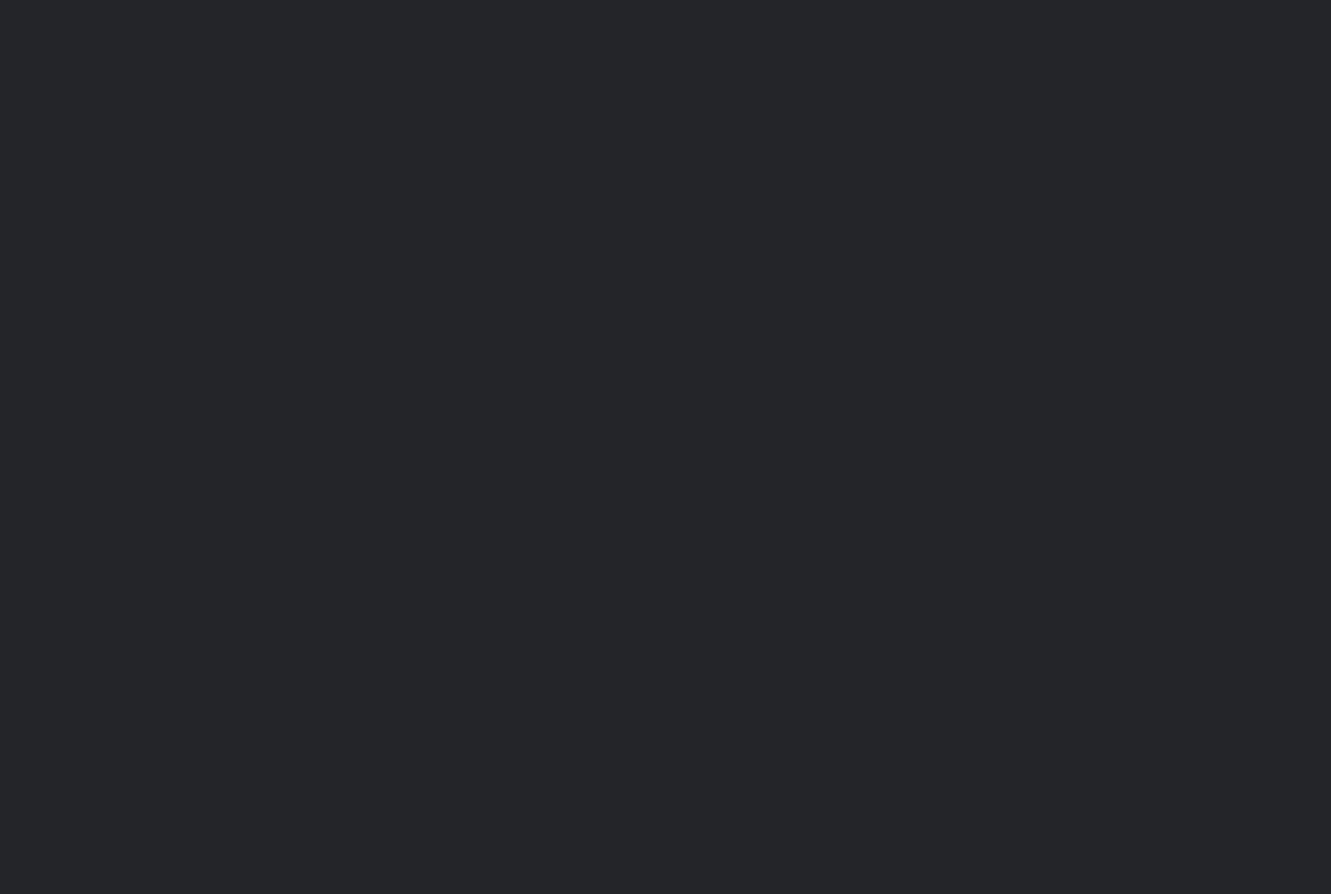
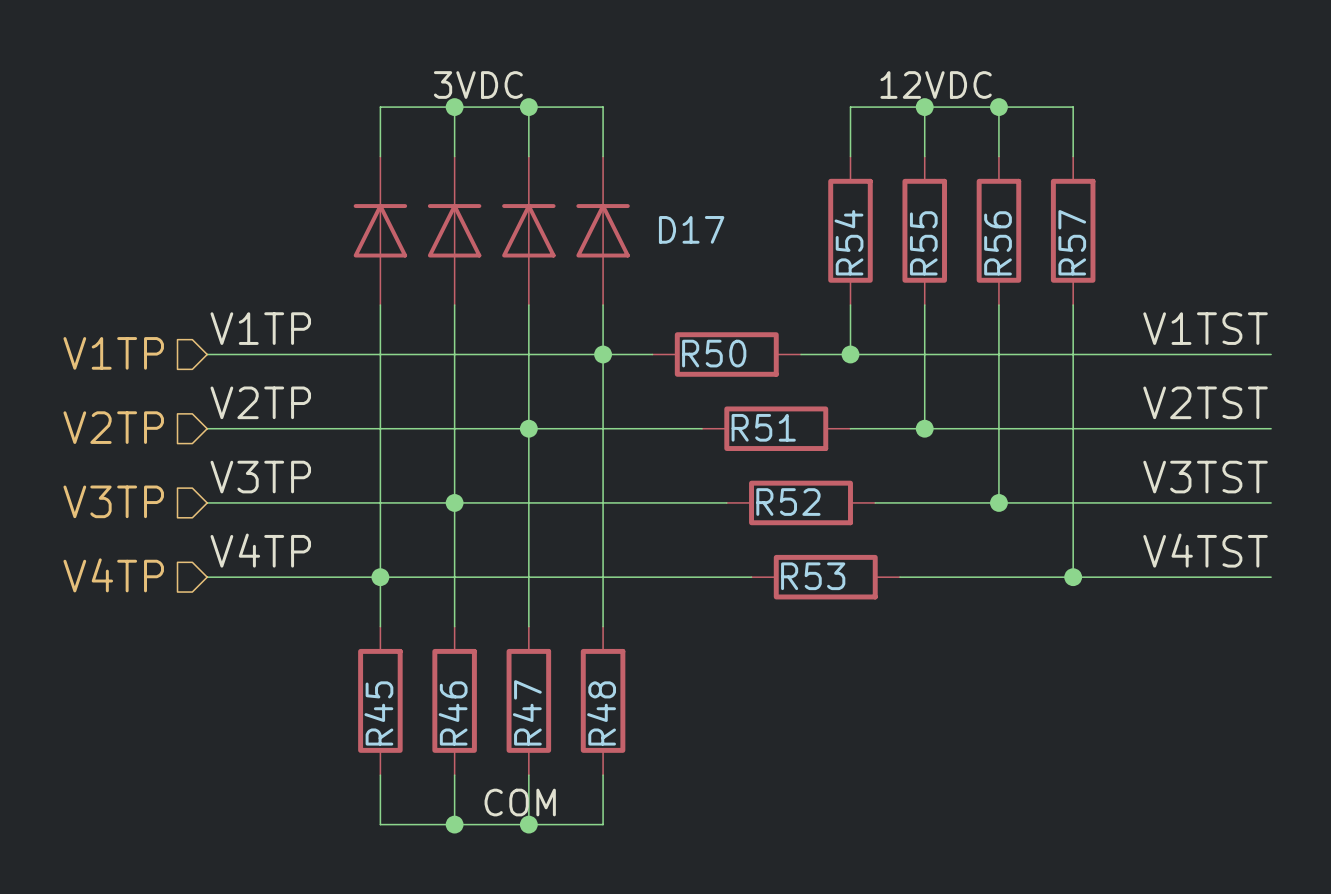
label: none -> 3VDC (478, 85)
label: none -> 12VDC (936, 85)
wire: none -> (454, 107) (454, 156)
junction: none -> (454, 107)
wire: none -> (528, 107) (528, 156)
junction: none -> (528, 107)
wire: none -> (924, 107) (924, 156)
junction: none -> (924, 107)
wire: none -> (998, 107) (998, 156)
junction: none -> (998, 107)
wire: none -> (380, 156) (380, 107) (603, 107) (603, 156)
wire: none -> (850, 156) (850, 107) (1073, 107) (1073, 156)
part: none -> (380, 230)
part: none -> (454, 230)
part: none -> (528, 230)
D17: none -> (603, 230)
R54: none -> (850, 230)
R55: none -> (924, 230)
R56: none -> (998, 230)
R57: none -> (1073, 230)
wire: none -> (380, 305) (380, 626)
wire: none -> (454, 305) (454, 626)
wire: none -> (528, 305) (528, 626)
wire: none -> (603, 305) (603, 626)
wire: none -> (850, 305) (850, 354)
wire: none -> (924, 305) (924, 428)
wire: none -> (998, 305) (998, 502)
wire: none -> (1073, 305) (1073, 577)
label: none -> V1TP (260, 328)
label: none -> V1TST (1205, 328)
hierarchical label: none -> V1TP (113, 353)
wire: none -> (207, 354) (652, 354)
junction: none -> (603, 354)
R50: none -> (726, 354)
wire: none -> (801, 354) (1271, 354)
junction: none -> (850, 354)
label: none -> V2TP (260, 402)
label: none -> V2TST (1205, 402)
hierarchical label: none -> V2TP (113, 427)
wire: none -> (207, 428) (702, 428)
junction: none -> (528, 428)
R51: none -> (776, 428)
wire: none -> (850, 428) (1271, 428)
junction: none -> (924, 428)
label: none -> V3TP (260, 477)
label: none -> V3TST (1205, 477)
hierarchical label: none -> V3TP (113, 501)
wire: none -> (207, 502) (726, 502)
junction: none -> (454, 502)
R52: none -> (801, 502)
wire: none -> (875, 502) (1271, 502)
junction: none -> (998, 502)
label: none -> V4TP (260, 550)
label: none -> V4TST (1205, 550)
hierarchical label: none -> V4TP (113, 575)
wire: none -> (207, 577) (751, 577)
junction: none -> (380, 577)
R53: none -> (825, 577)
wire: none -> (899, 577) (1271, 577)
junction: none -> (1073, 577)
R45: none -> (380, 700)
R46: none -> (454, 700)
R47: none -> (528, 700)
R48: none -> (603, 700)
wire: none -> (380, 775) (380, 824) (603, 824) (603, 775)
wire: none -> (454, 775) (454, 824)
wire: none -> (528, 775) (528, 824)
label: none -> COM (520, 802)
junction: none -> (454, 824)
junction: none -> (528, 824)

